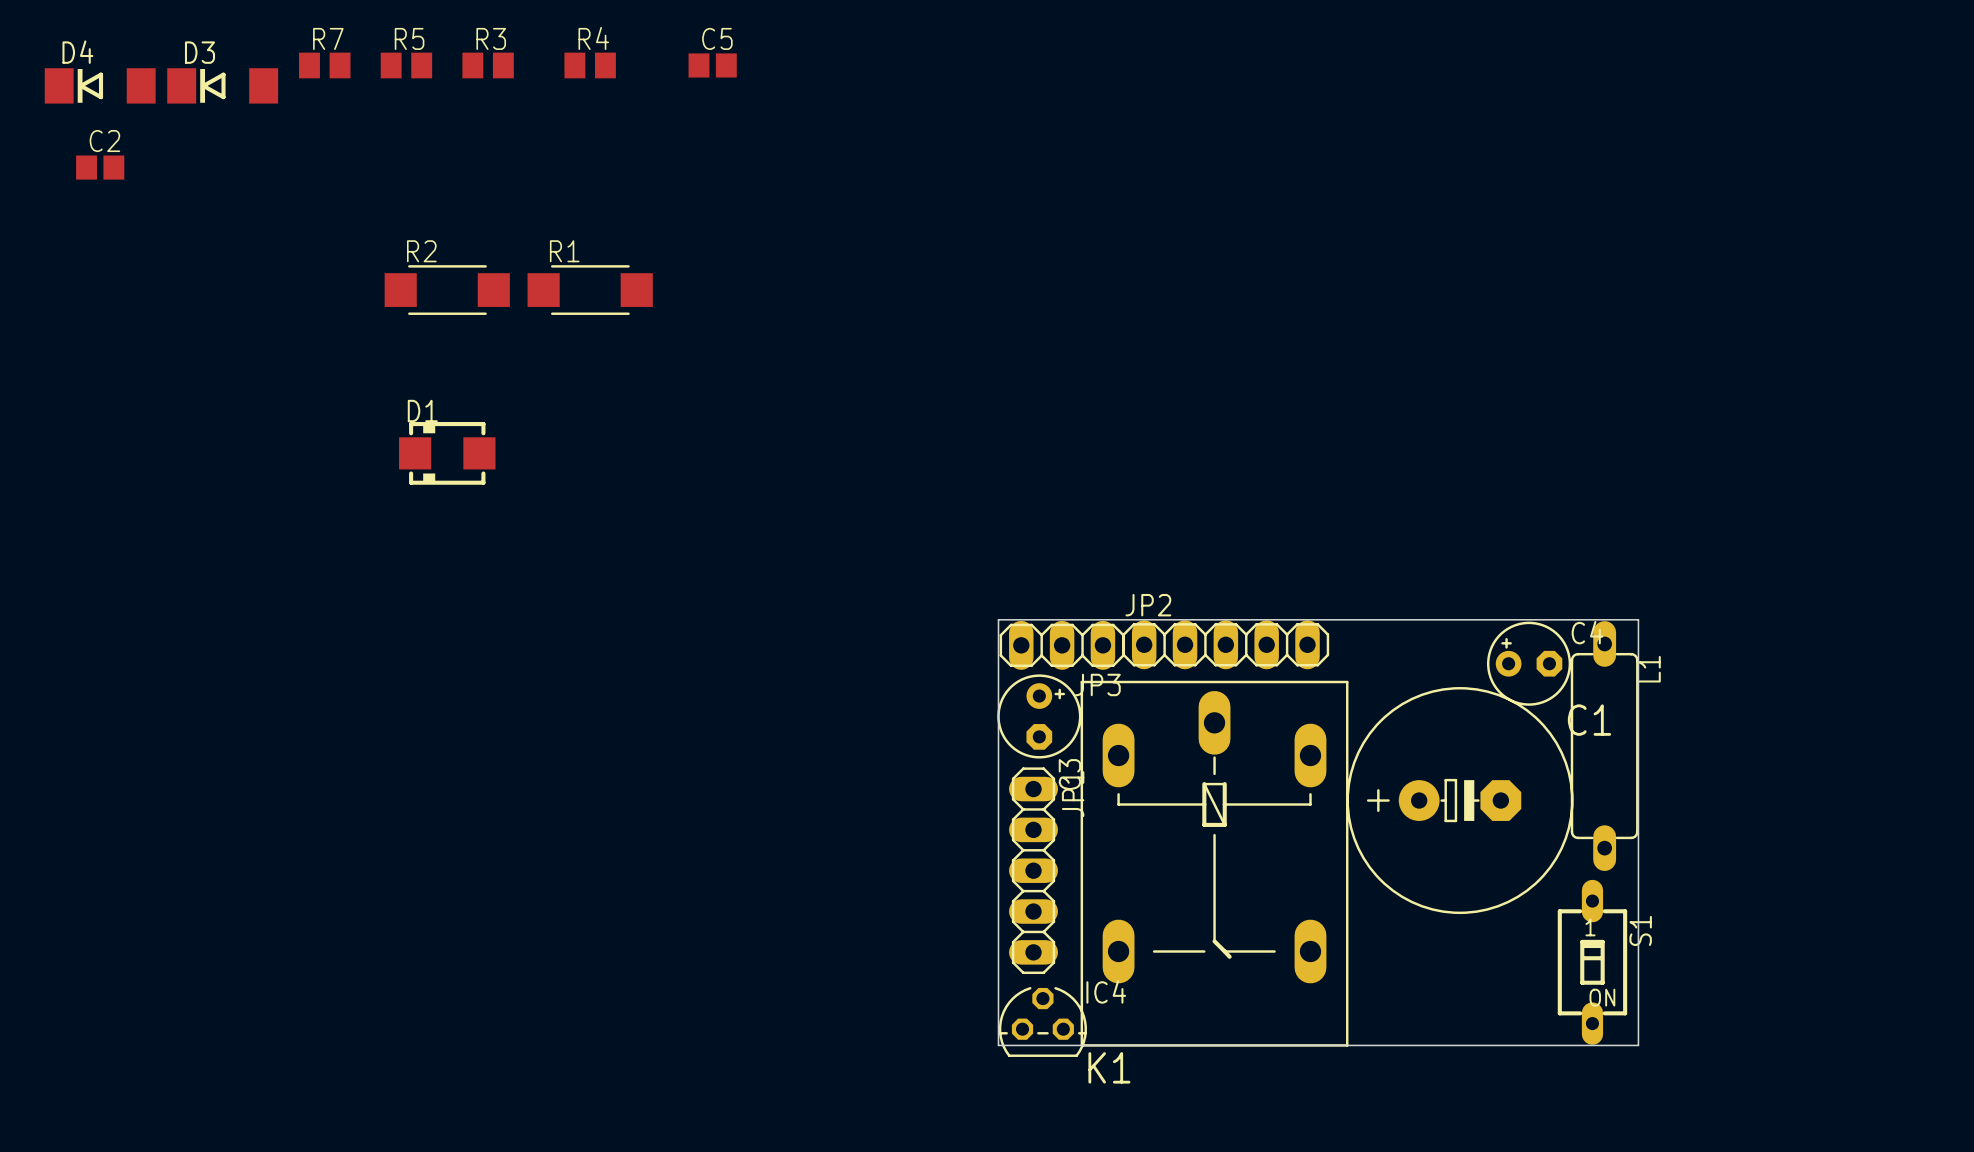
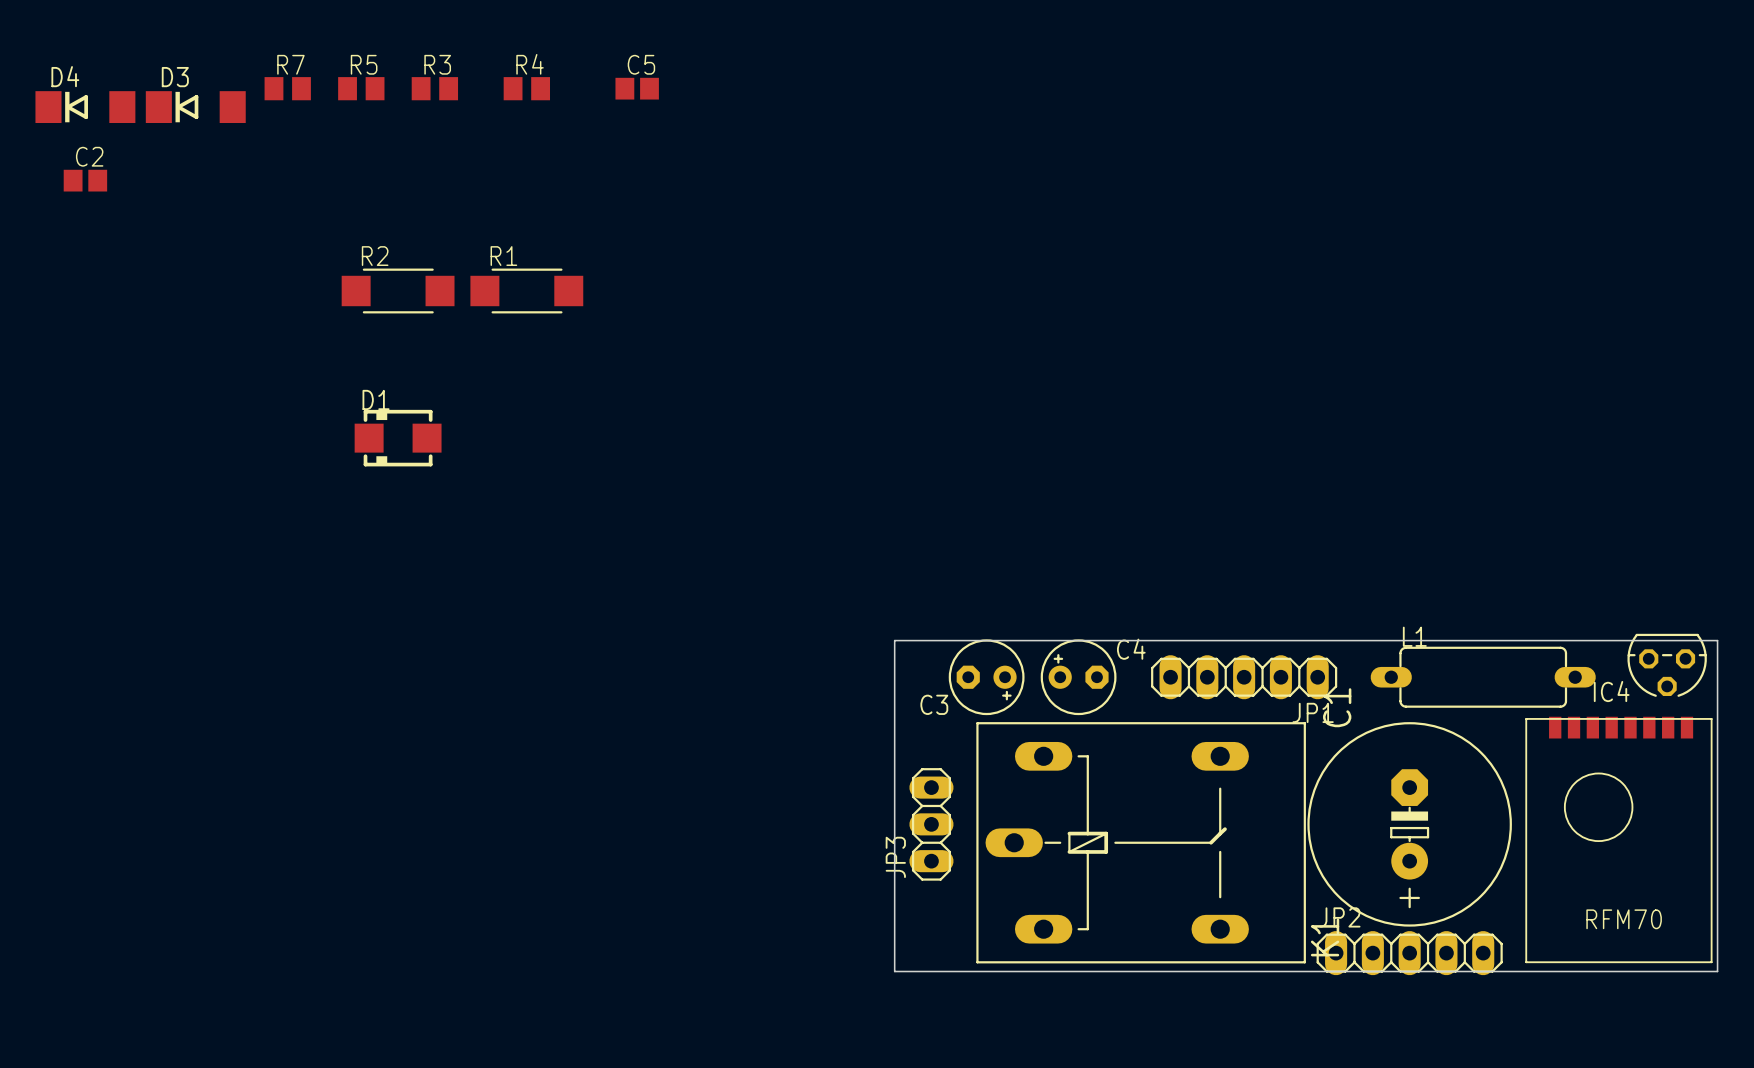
JP2 position: (1225, 644) -> (1409, 953)
JP3 rotation: 0° (1062, 645) -> 90° clockwise (931, 824)
JP3 position: (1062, 645) -> (931, 824)
C4 position: (1529, 663) -> (1078, 677)
L1 name position: L1 (1649, 669) -> L1 (1414, 636)
board edge: (998, 678) (998, 619) (1638, 619) (1638, 1045) -> (894, 640) (1717, 640) (1717, 971) (1471, 971)
C3 rotation: 0° (1039, 716) -> 90° clockwise (986, 677)
C3 position: (1039, 716) -> (986, 677)
L1 rotation: 0° (1604, 746) -> 90° clockwise (1483, 677)
C1 rotation: 0° (1460, 800) -> 90° counterclockwise (1409, 824)
C1 position: (1460, 800) -> (1409, 824)
K1 rotation: 0° (1214, 863) -> 90° counterclockwise (1141, 842)
JP1 rotation: 0° (1033, 870) -> 90° clockwise (1244, 677)
JP1 position: (1033, 870) -> (1244, 677)
part: none -> (1618, 839)
S1: (1592, 962) -> none
IC4 rotation: 0° (1042, 1021) -> 180° (1667, 665)
IC4 position: (1042, 1021) -> (1667, 665)

